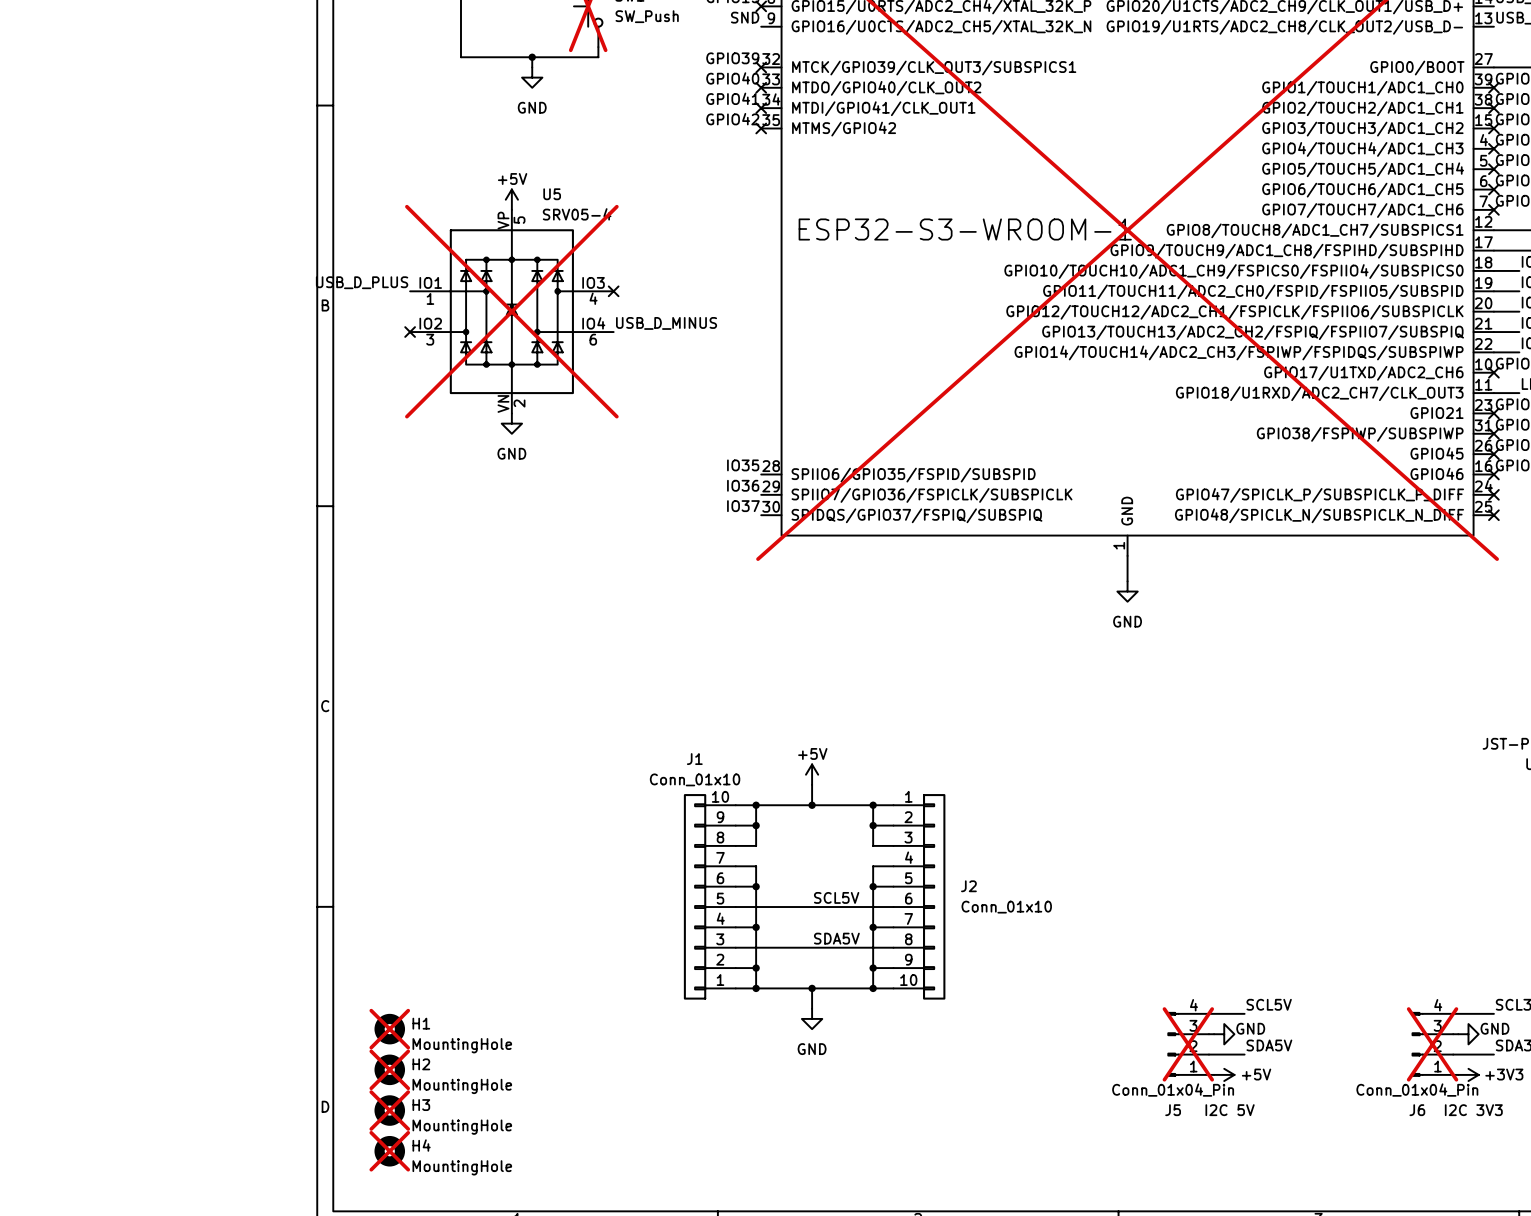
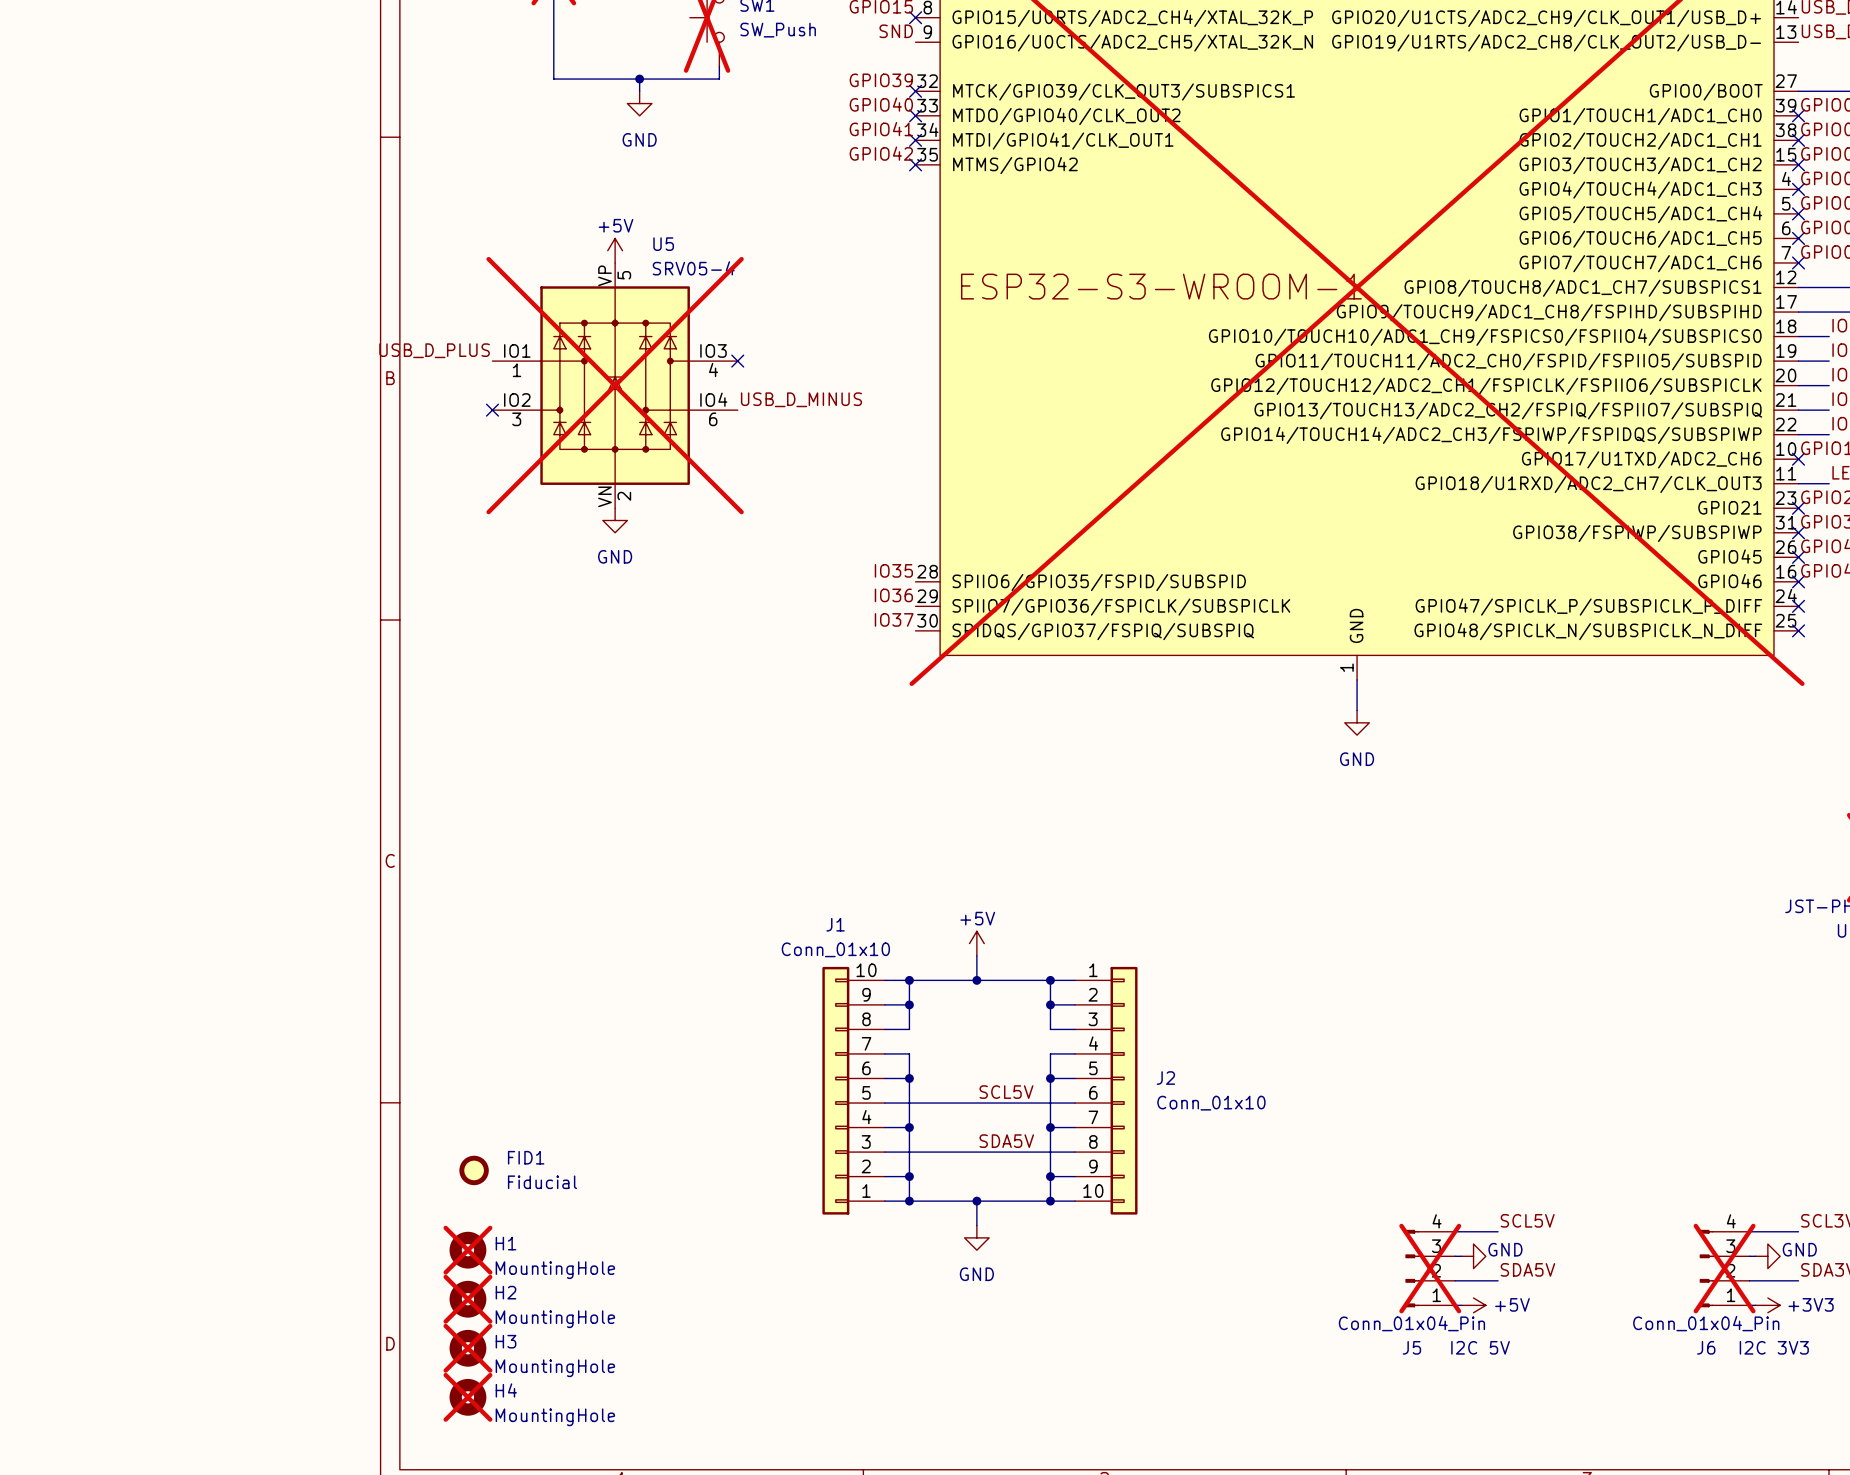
FID1: none -> Fiducial (474, 1170)

